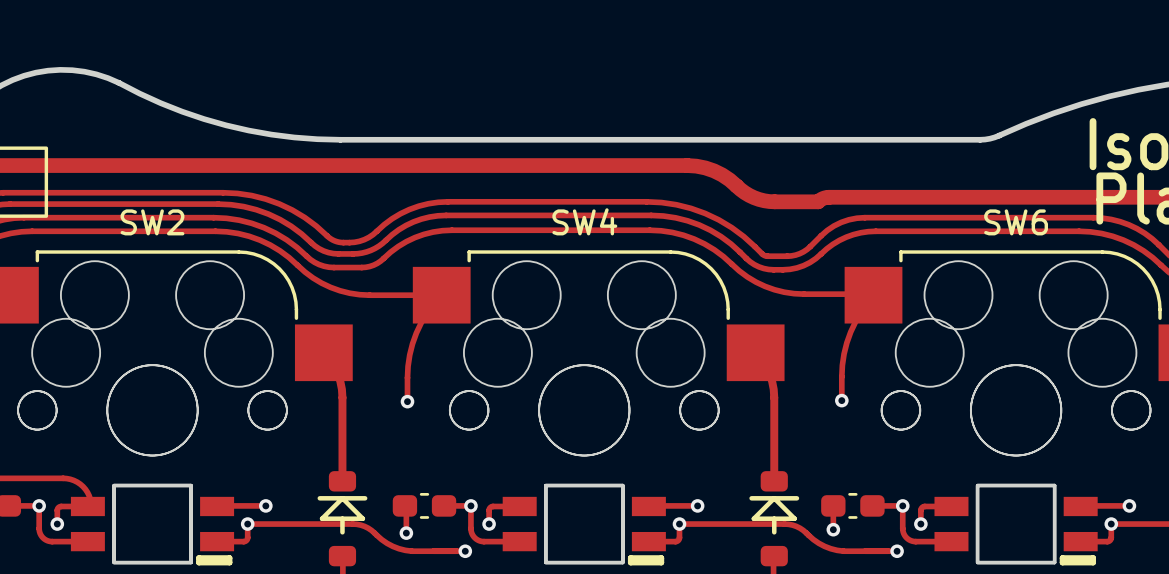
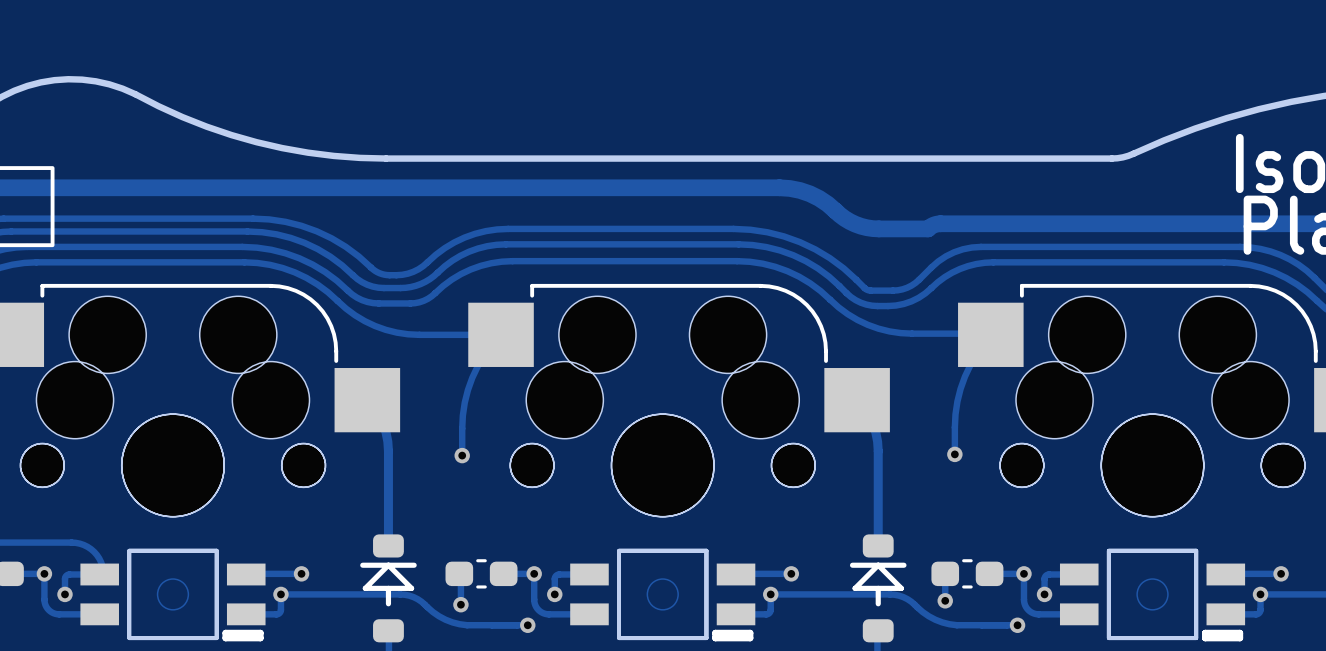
SW4 name: SW4 (584, 221) -> none
SW2 name: SW2 (152, 222) -> none
SW6 name: SW6 (1016, 222) -> none
part: none -> (172, 453)
part: none -> (662, 453)
part: none -> (1152, 453)

